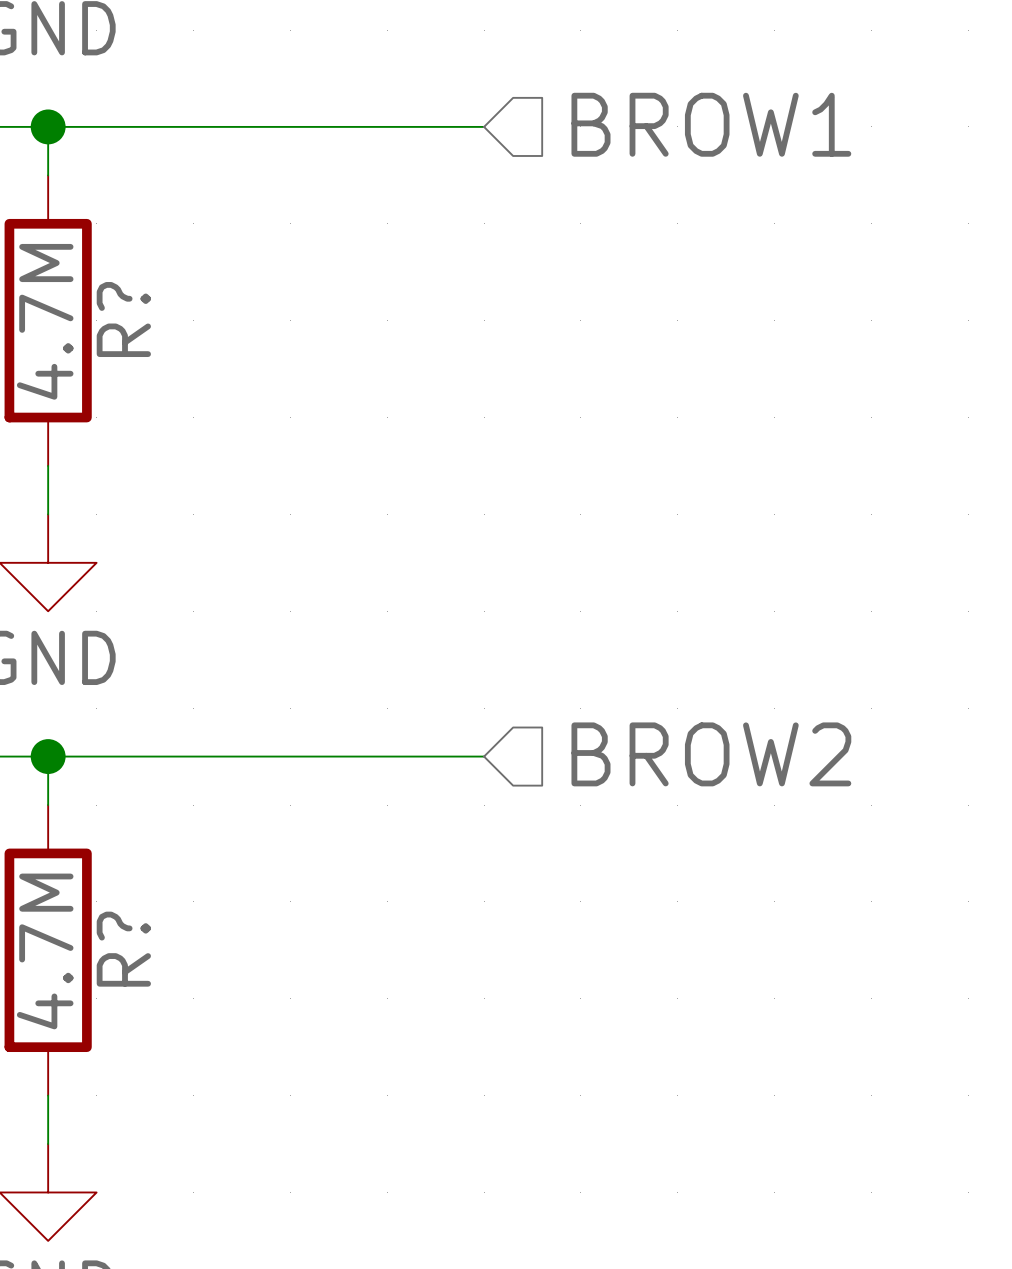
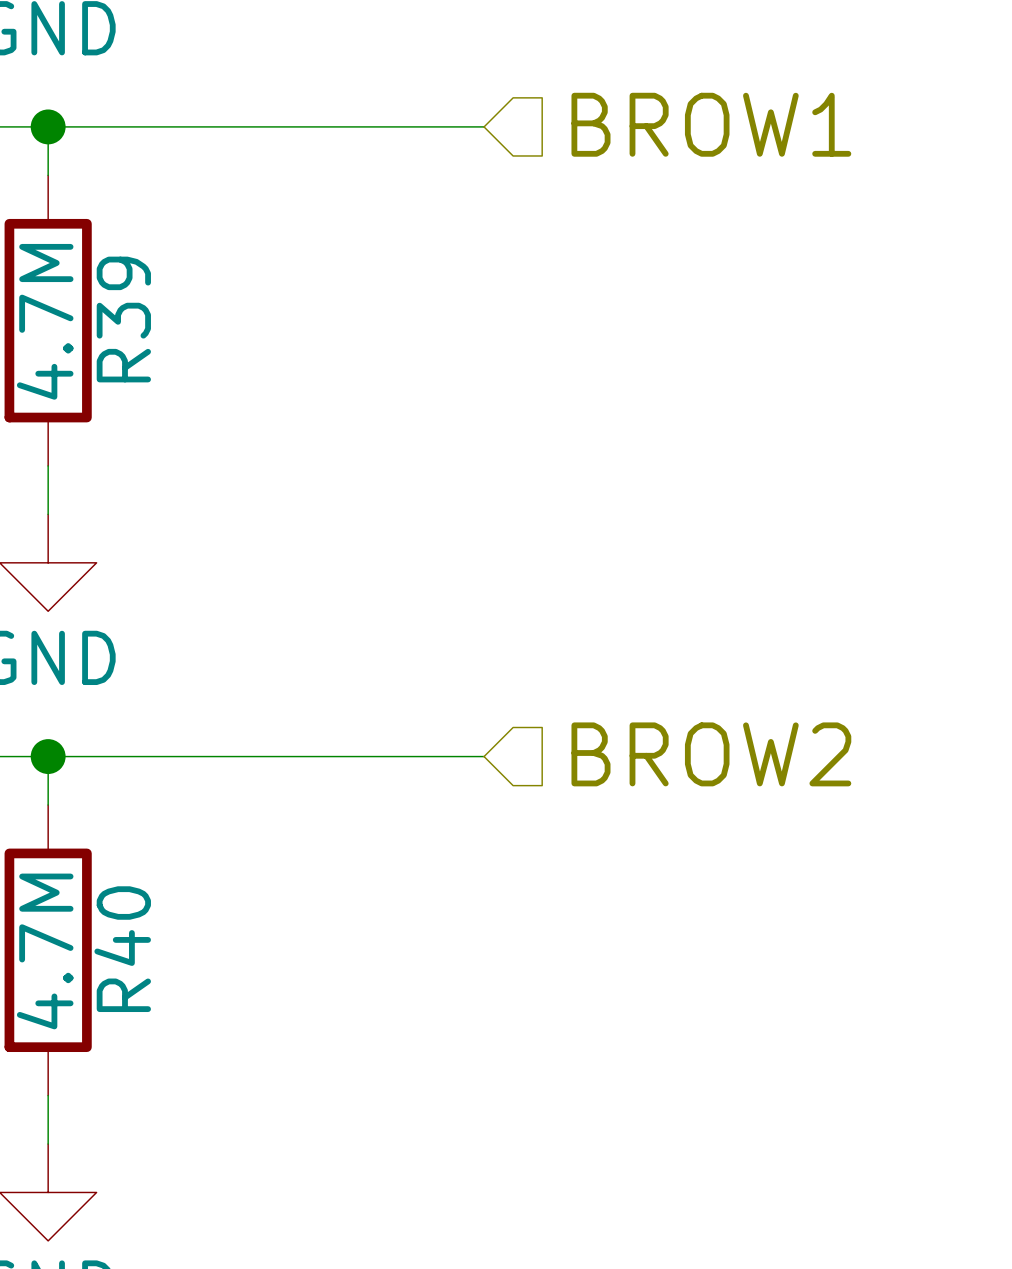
R? name: R? (123, 319) -> R39 (123, 319)
R? name: R? (123, 949) -> R40 (122, 949)

